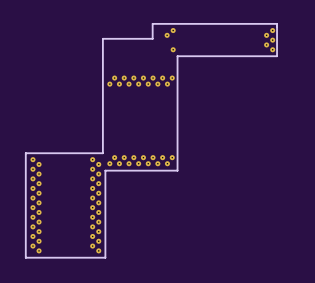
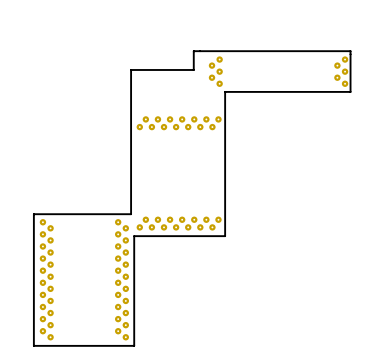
part footprint: [164, 28, 176, 53] -> [208, 56, 223, 87]

